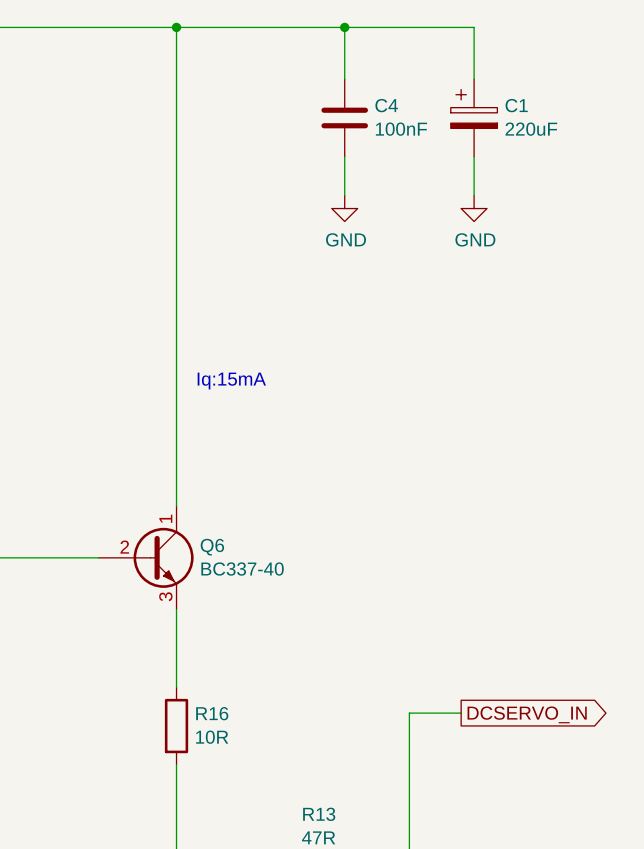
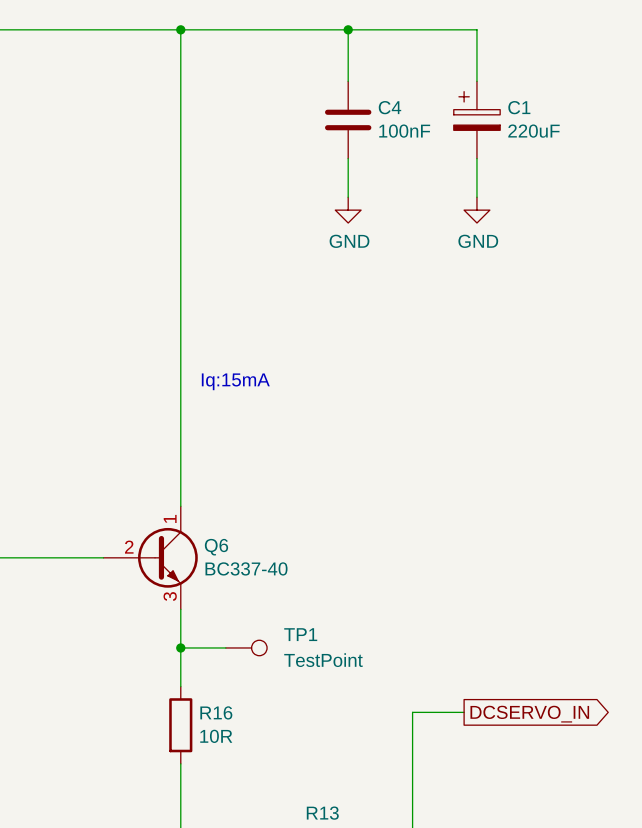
wire: none -> (180, 647) (225, 647)
junction: none -> (180, 647)
TP1: none -> TestPoint (246, 647)

